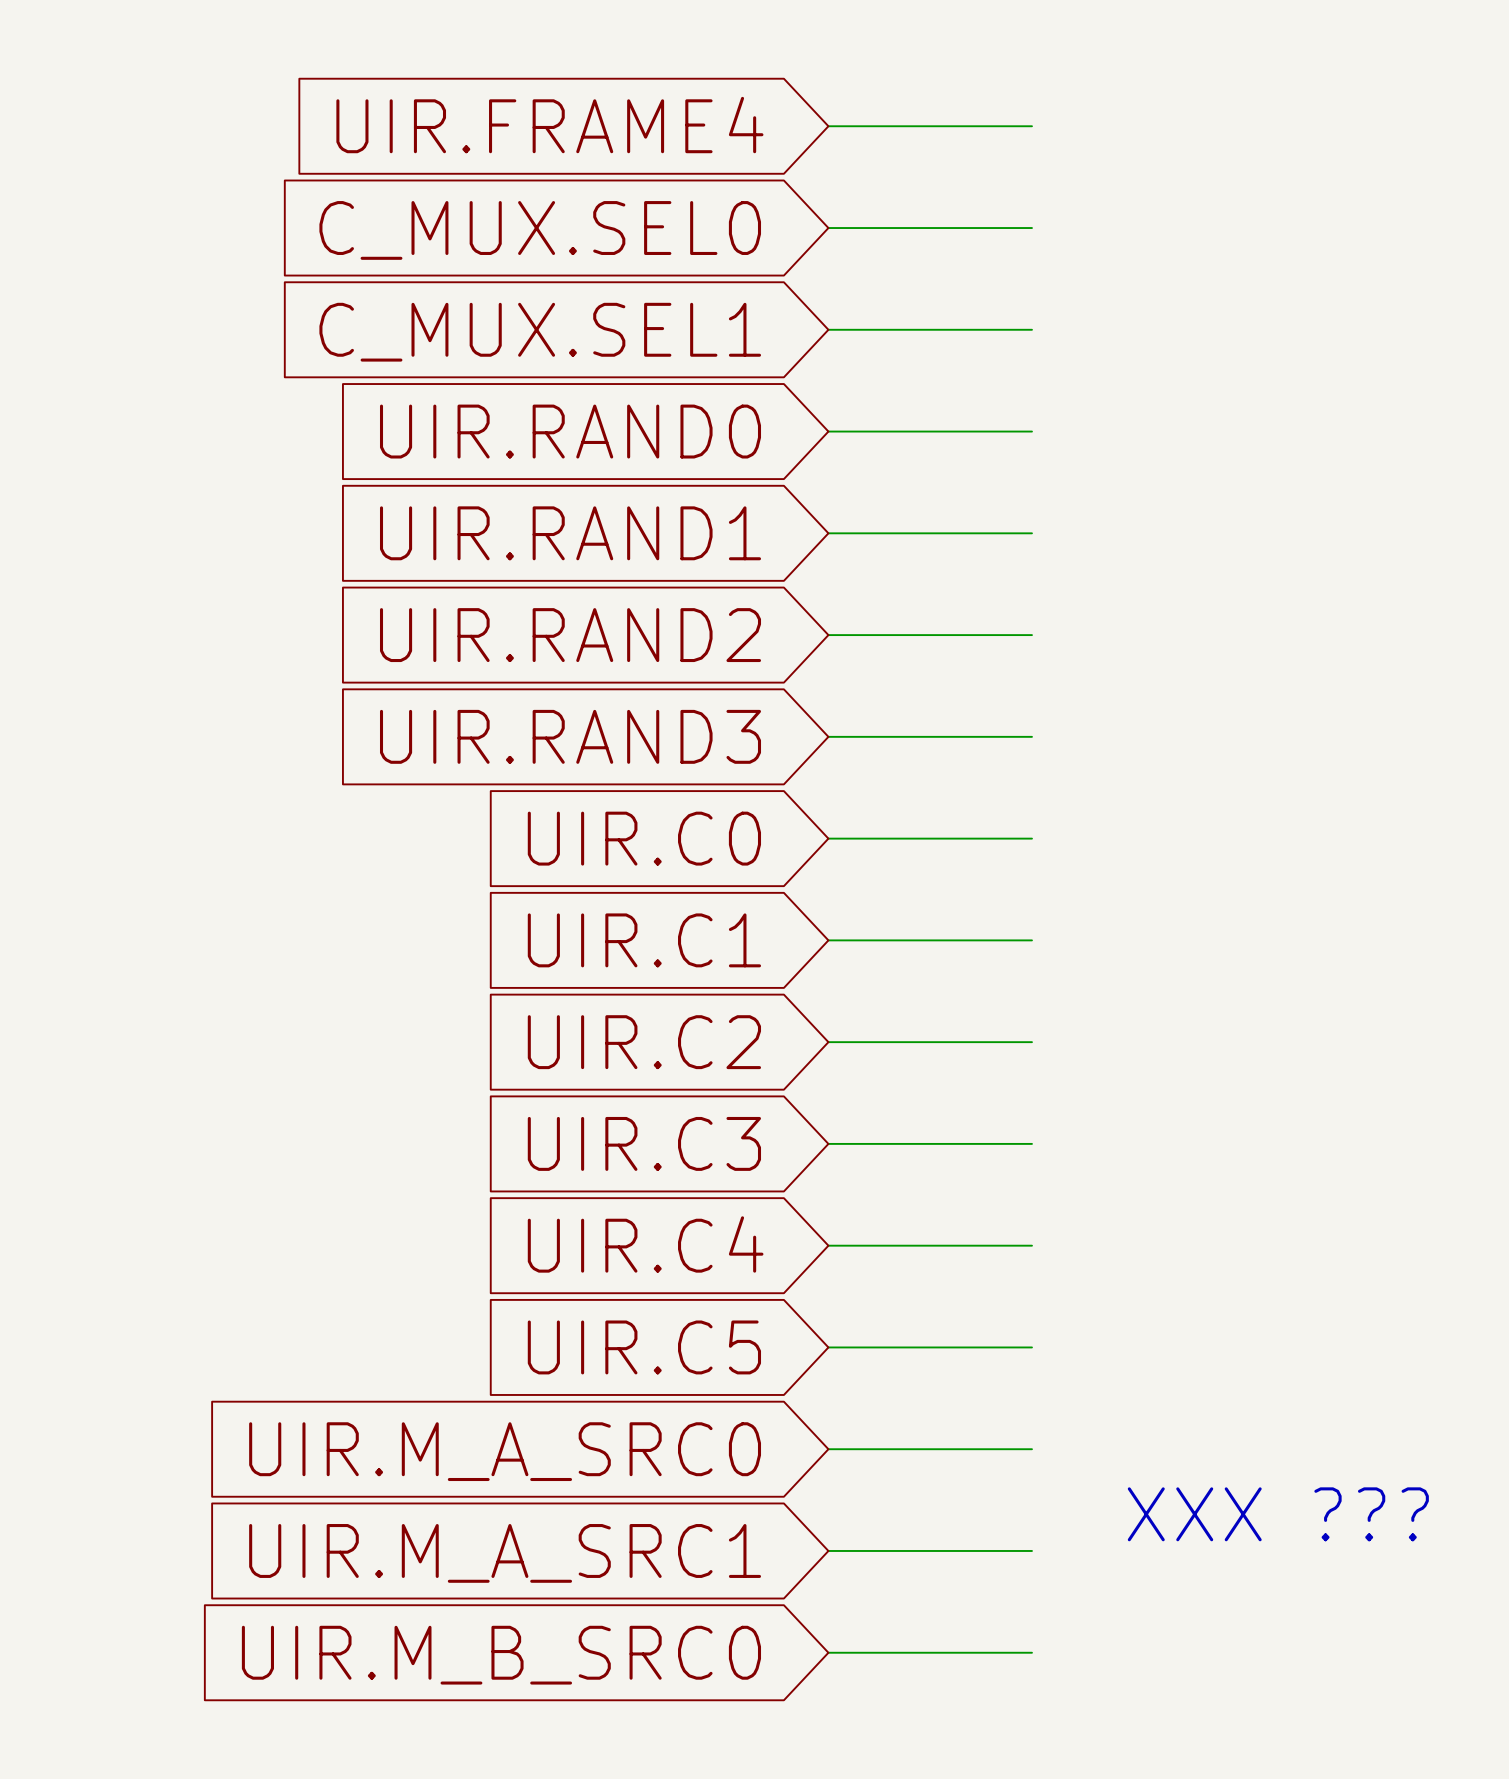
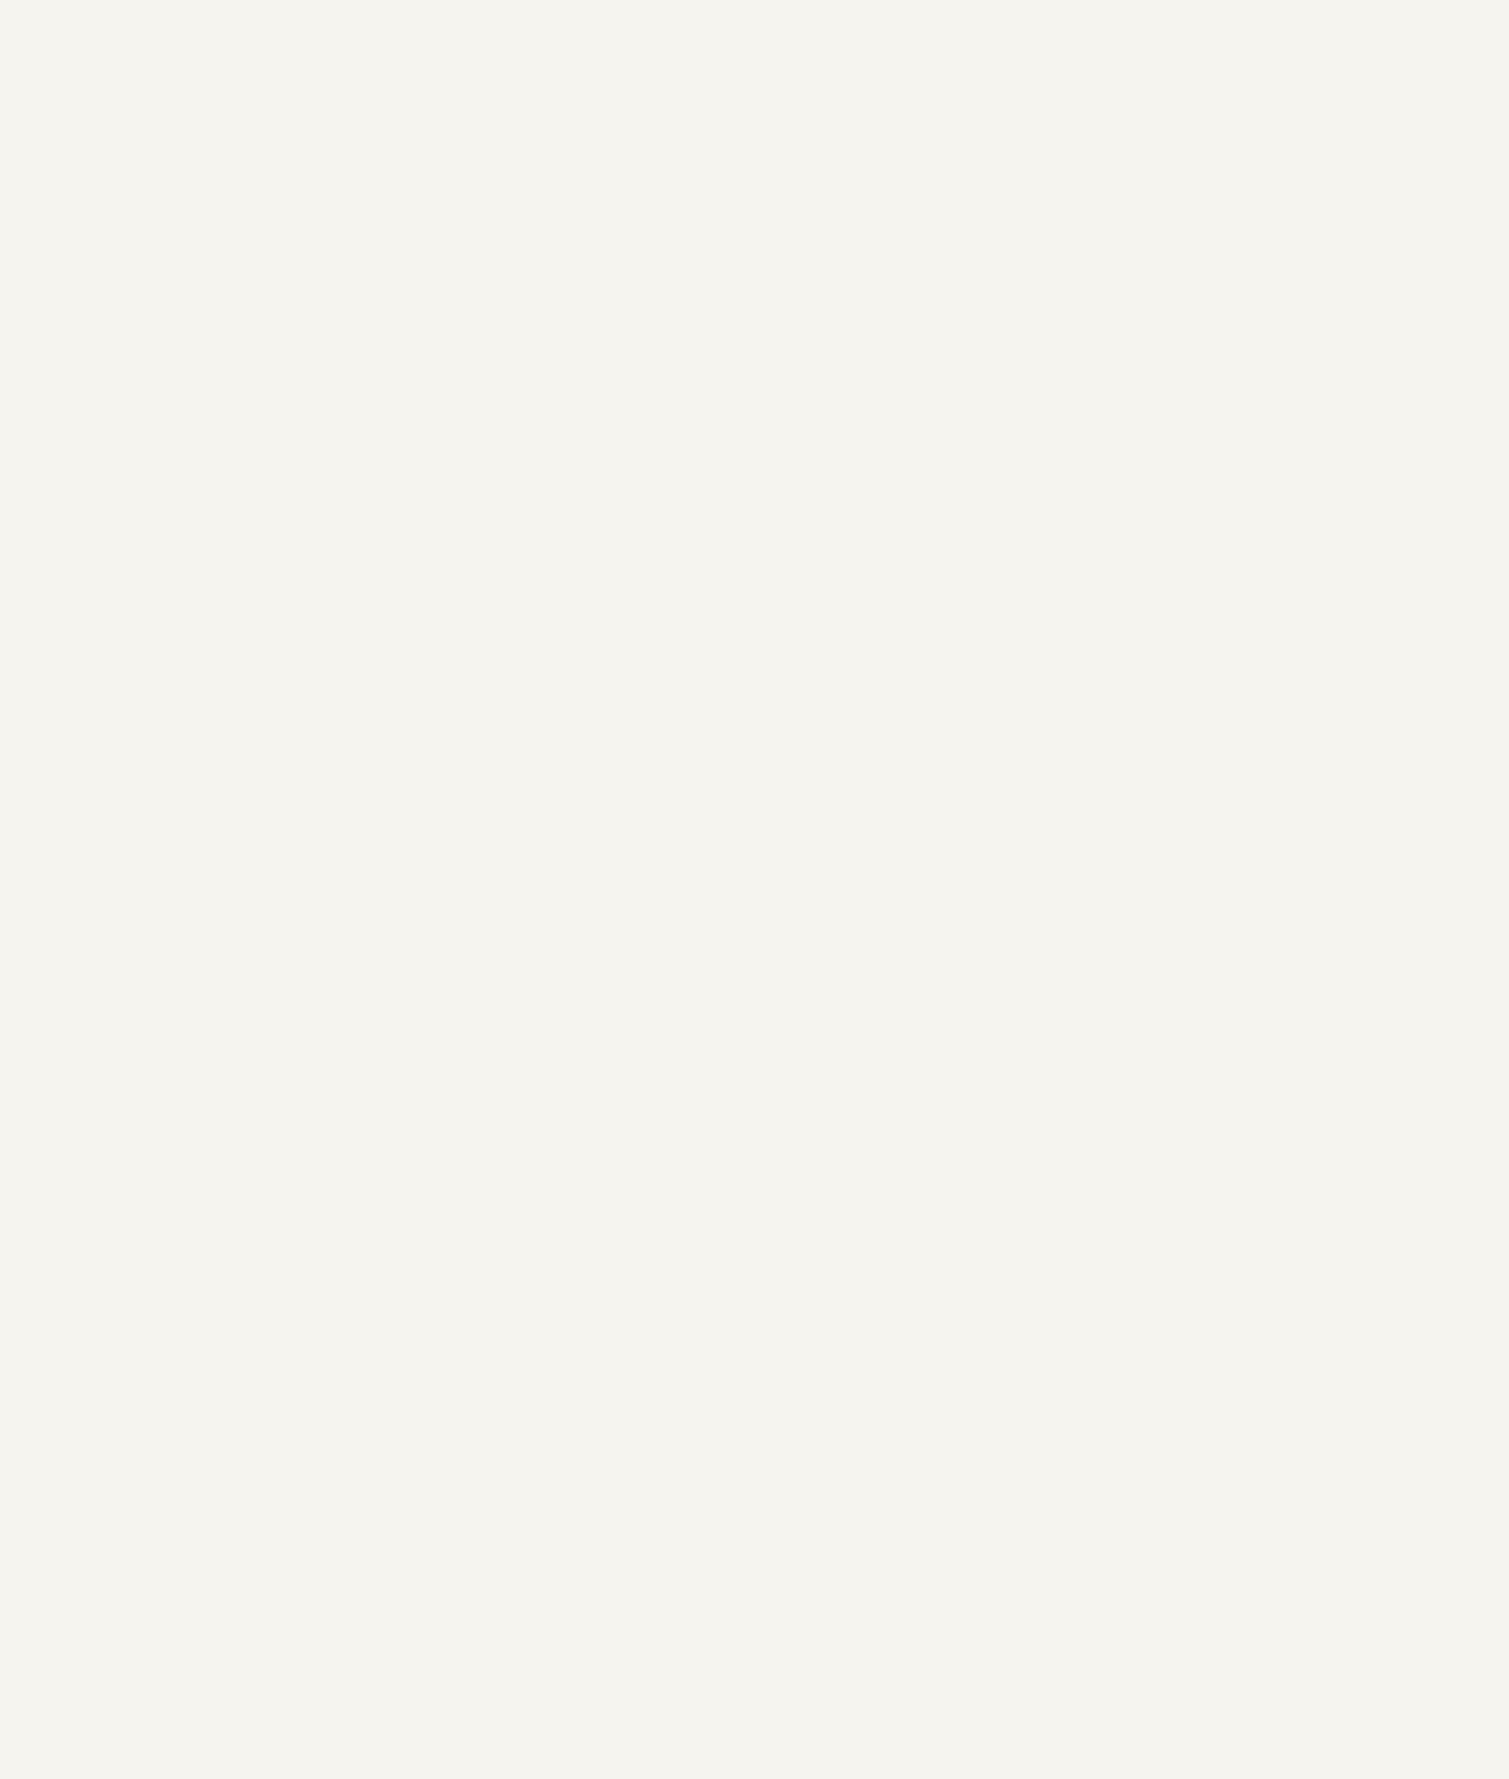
global label: UIR.FRAME4 (549, 125) -> none
wire: (828, 126) (1031, 126) -> none
wire: (828, 228) (1031, 228) -> none
global label: C_MUX.SEL0 (540, 230) -> none
wire: (828, 329) (1031, 329) -> none
global label: C_MUX.SEL1 (540, 332) -> none
global label: UIR.RAND0 (570, 431) -> none
wire: (828, 431) (1031, 431) -> none
global label: UIR.RAND1 (570, 533) -> none
wire: (828, 533) (1031, 533) -> none
global label: UIR.RAND2 (570, 635) -> none
wire: (828, 635) (1031, 635) -> none
global label: UIR.RAND3 (570, 736) -> none
wire: (828, 736) (1031, 736) -> none
global label: UIR.C0 (644, 838) -> none
wire: (828, 838) (1031, 838) -> none
global label: UIR.C1 (644, 940) -> none
wire: (828, 940) (1031, 940) -> none
global label: UIR.C2 (644, 1042) -> none
wire: (828, 1042) (1031, 1042) -> none
global label: UIR.C3 (644, 1143) -> none
wire: (828, 1143) (1031, 1143) -> none
global label: UIR.C4 (645, 1244) -> none
wire: (828, 1245) (1031, 1245) -> none
global label: UIR.C5 (644, 1347) -> none
wire: (828, 1347) (1031, 1347) -> none
wire: (828, 1449) (1031, 1449) -> none
global label: UIR.M_A_SRC0 (505, 1451) -> none
text: XXX ??? (1278, 1514) -> none
wire: (828, 1550) (1031, 1550) -> none
global label: UIR.M_A_SRC1 (505, 1553) -> none
wire: (828, 1652) (1031, 1652) -> none
global label: UIR.M_B_SRC0 (501, 1655) -> none

